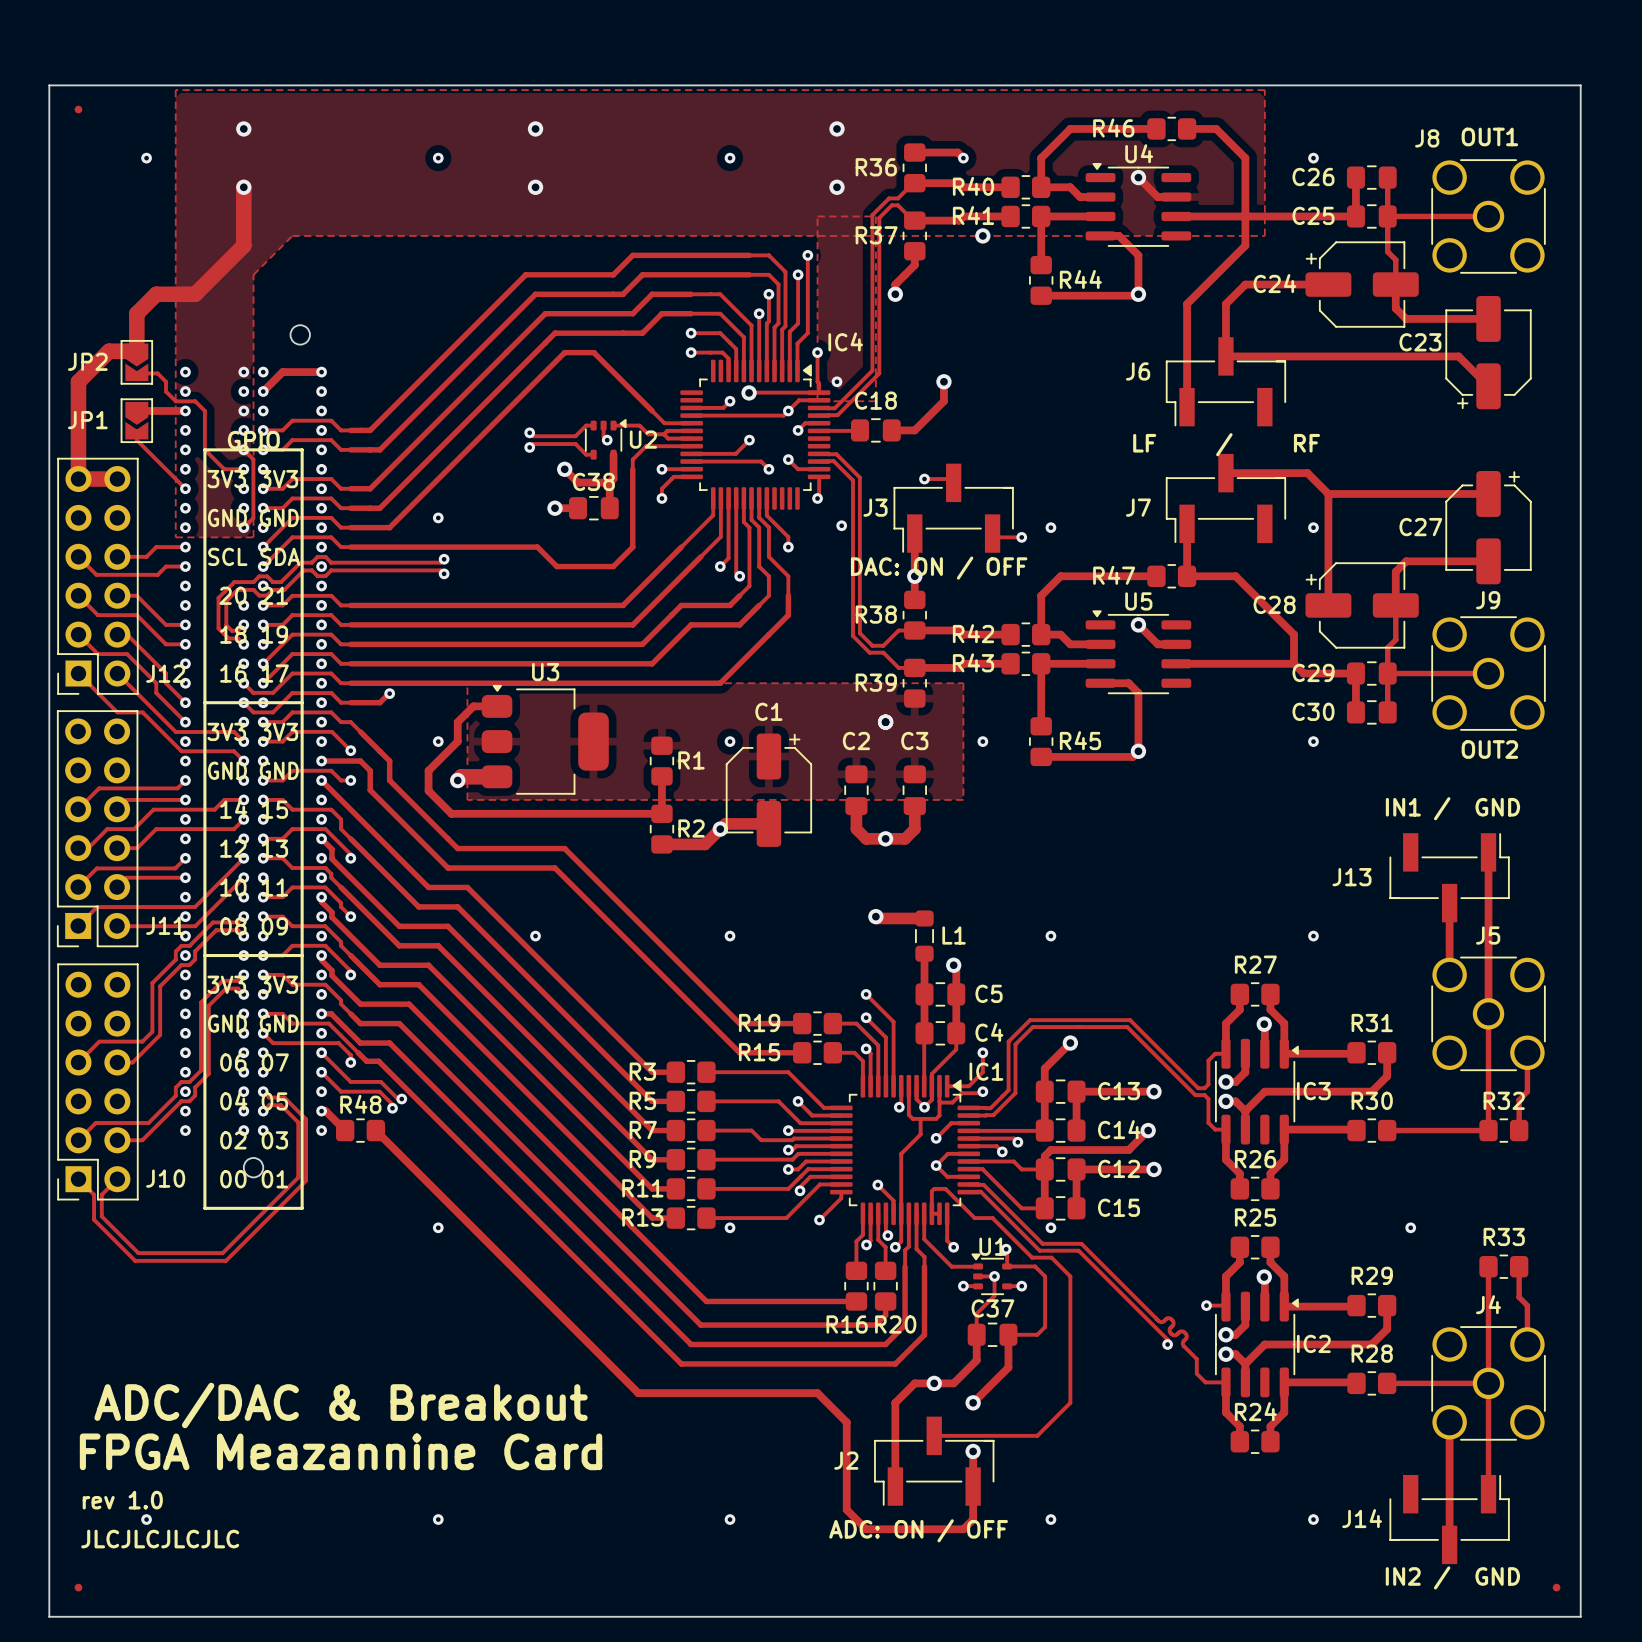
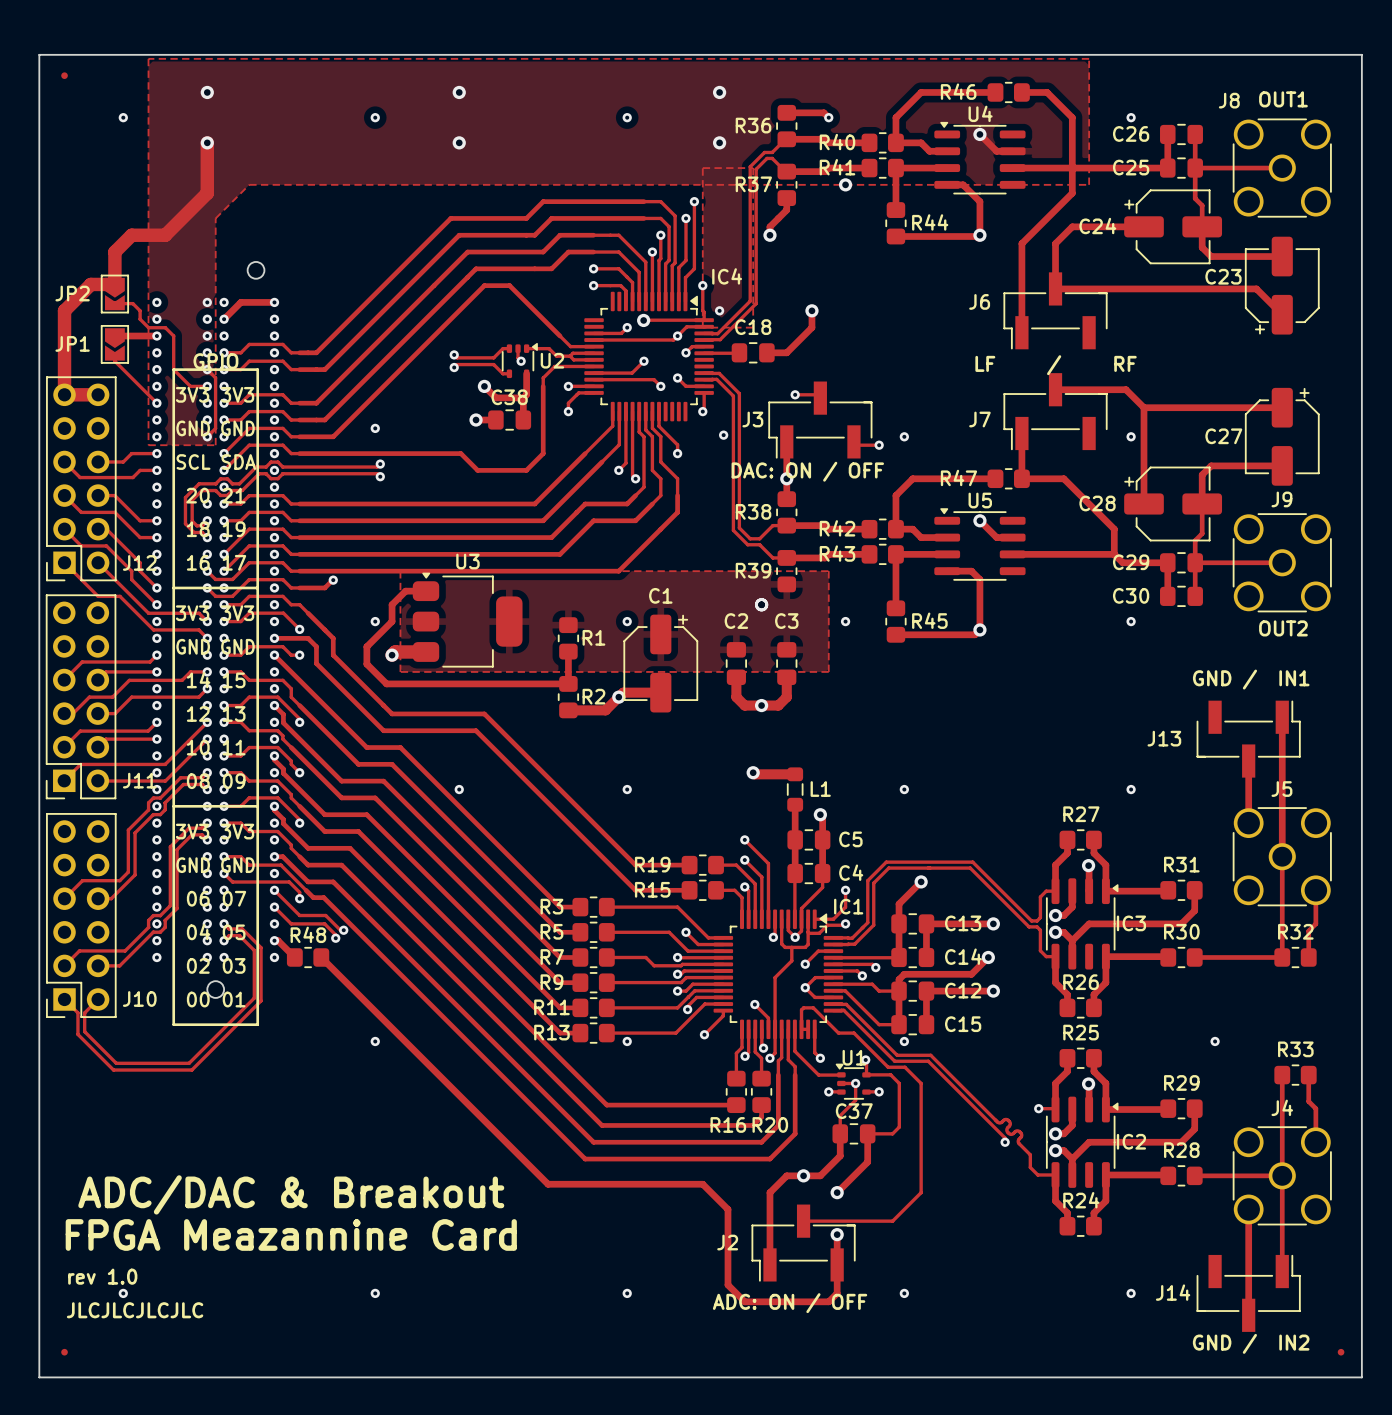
text: IN1 / GND (1452, 808) -> GND / IN1 (1251, 679)
text: IN2 / GND (1452, 1577) -> GND / IN2 (1251, 1343)

